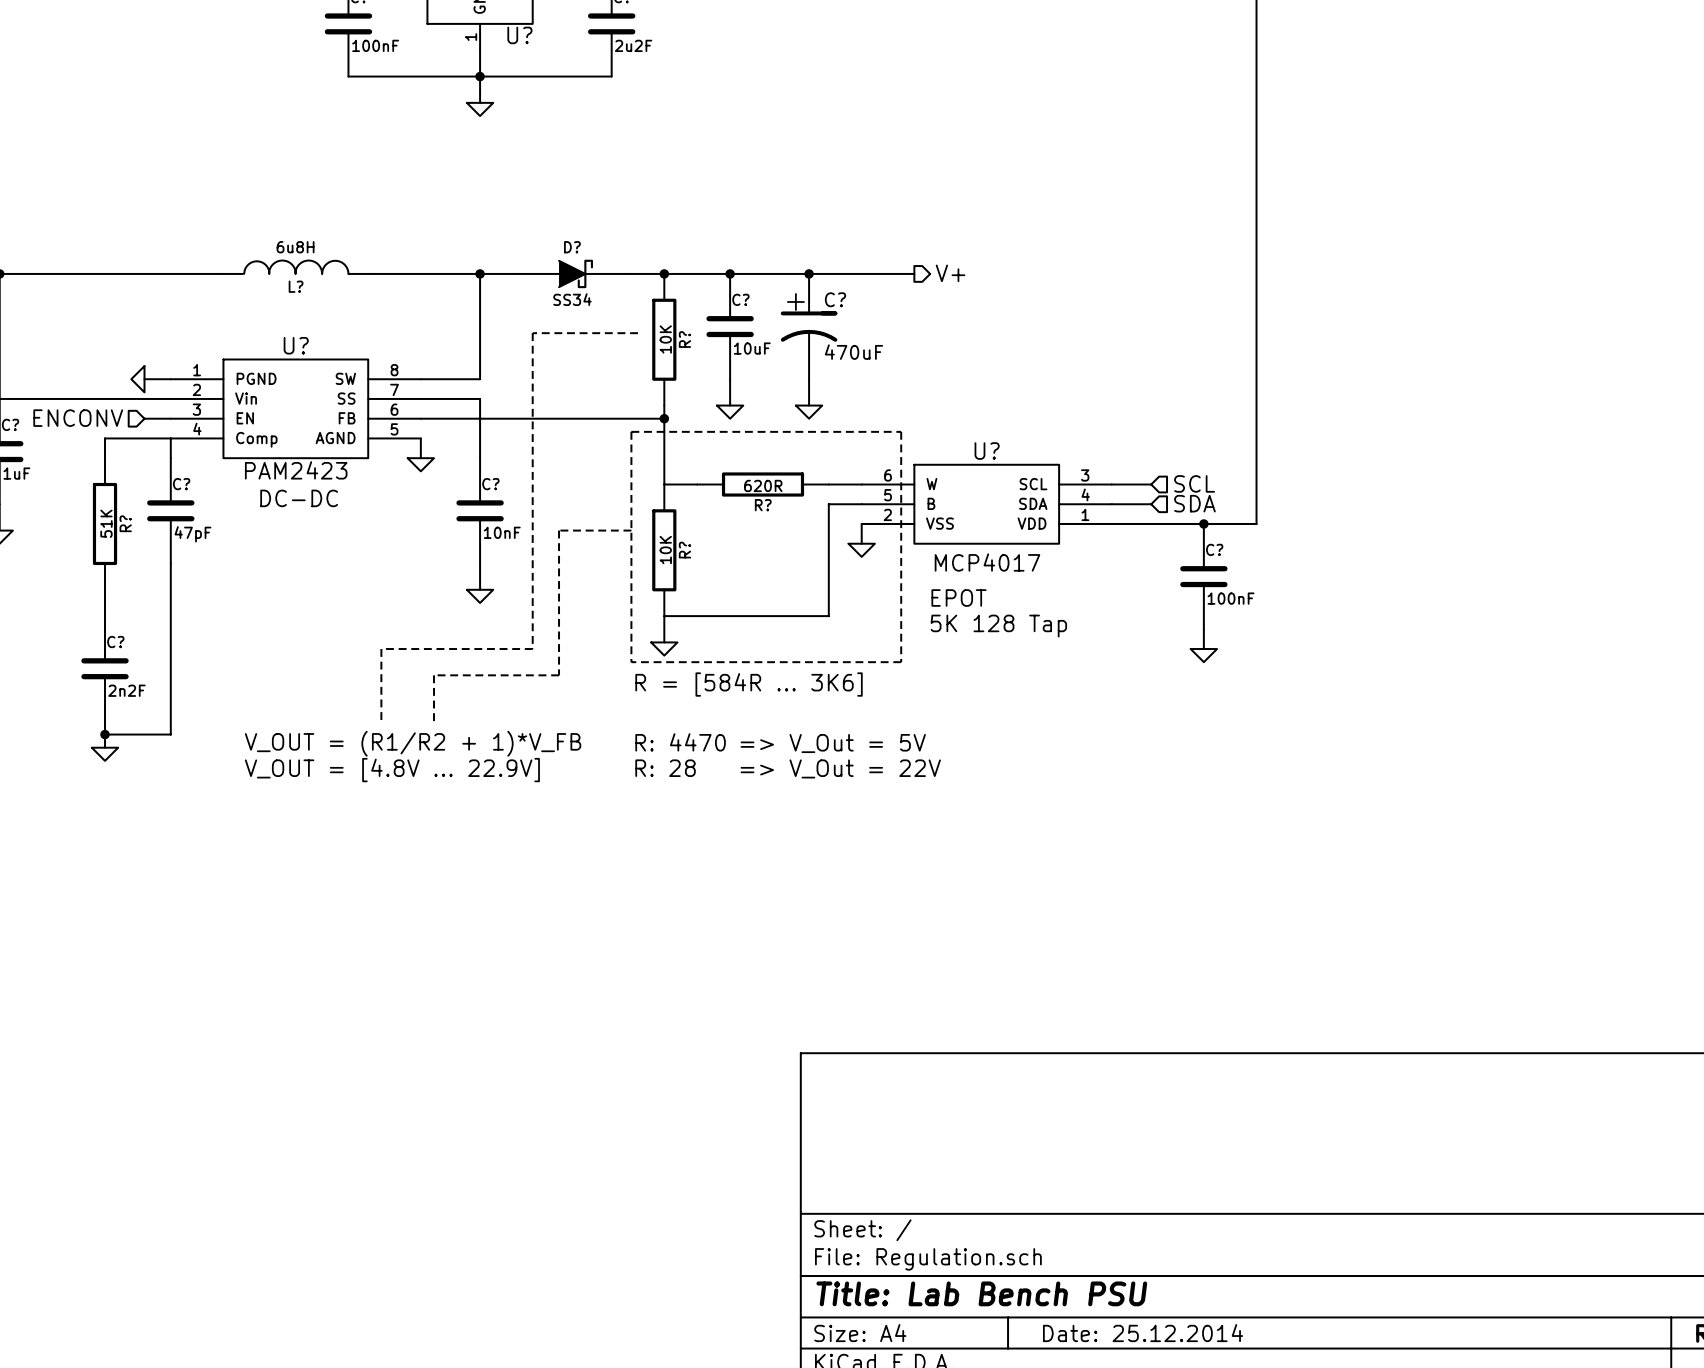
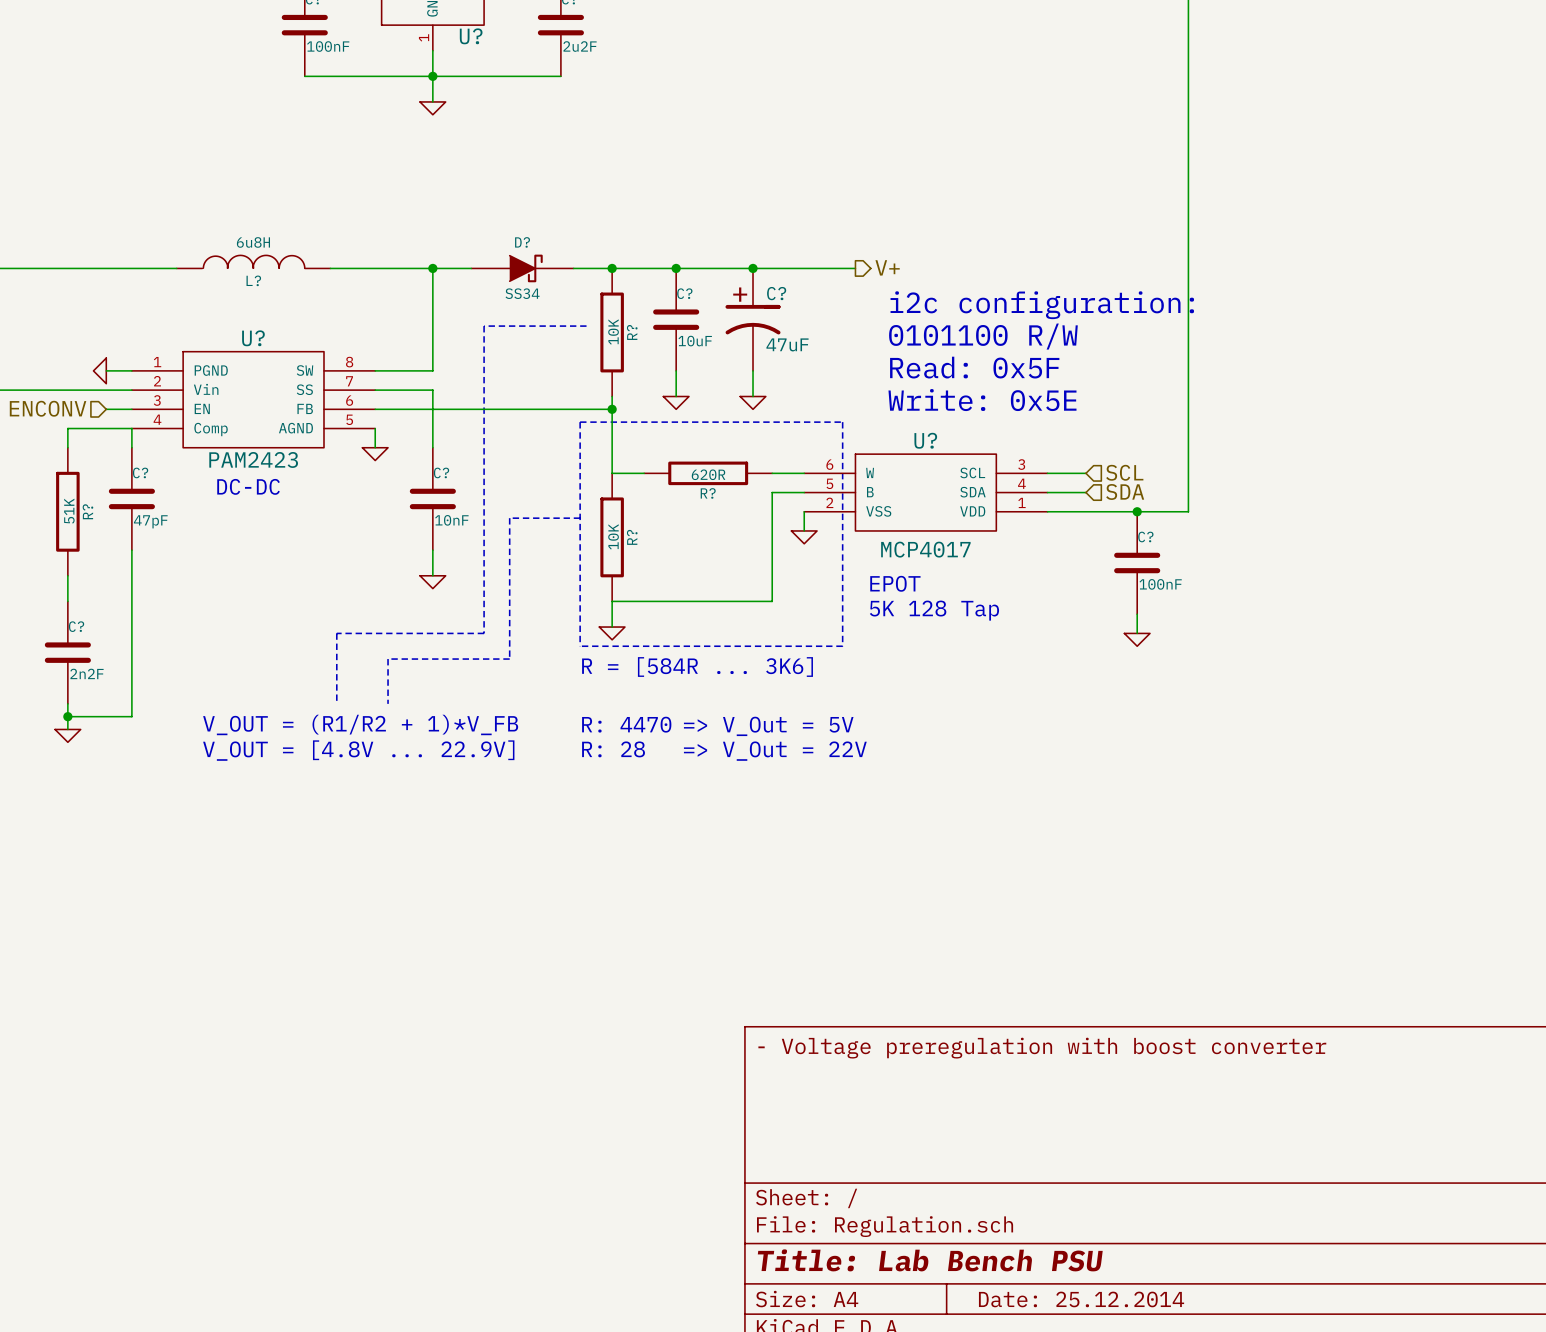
text: none -> i2c configuration: (1042, 305)
text: none -> 0101100 R/W (983, 336)
C? value: 470uF (853, 352) -> 47uF (787, 344)
text: none -> Read: 0x5F (974, 367)
text: none -> Write: 0x5E (982, 400)
title block: none -> - Voltage preregulation with boost converter (1042, 1048)

